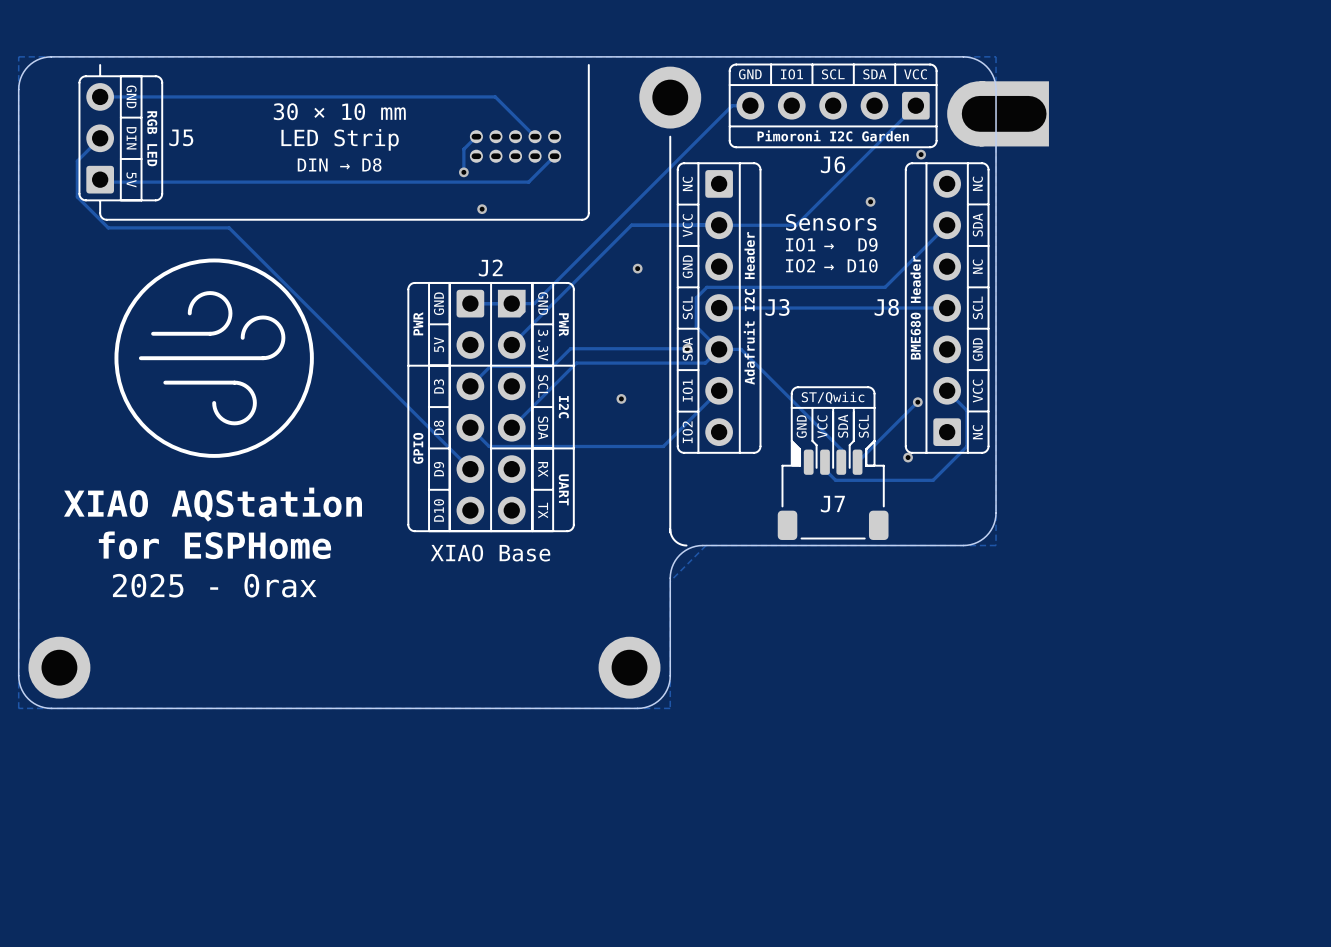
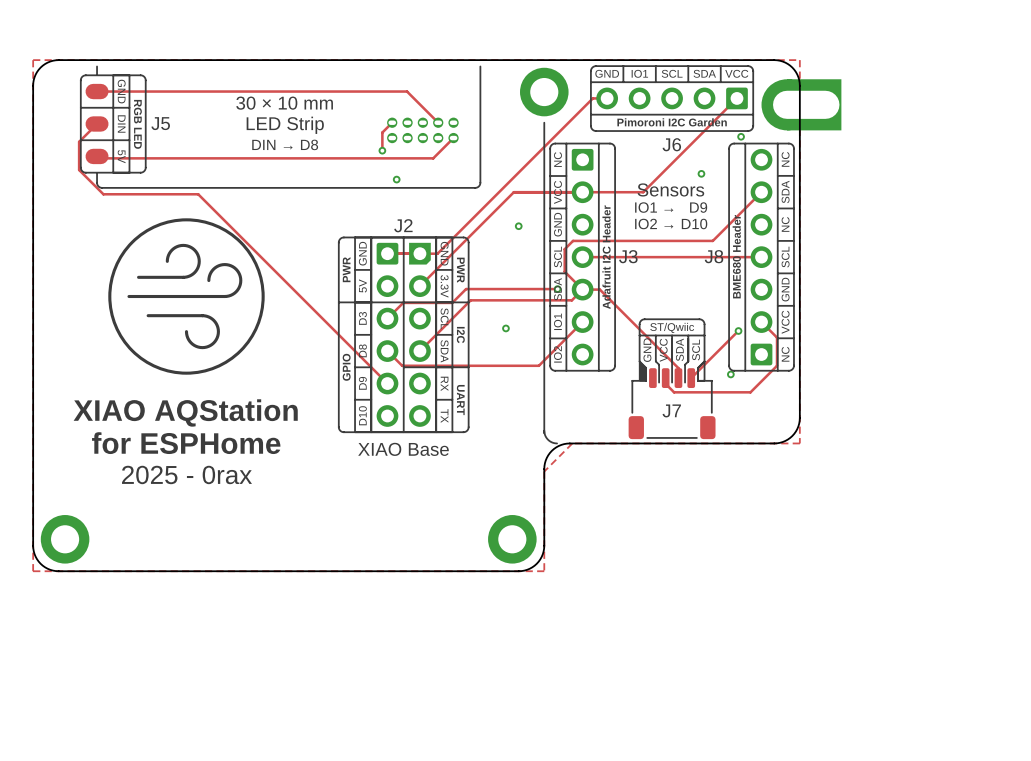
J5 footprint: [78, 75, 164, 202] -> [80, 74, 147, 174]

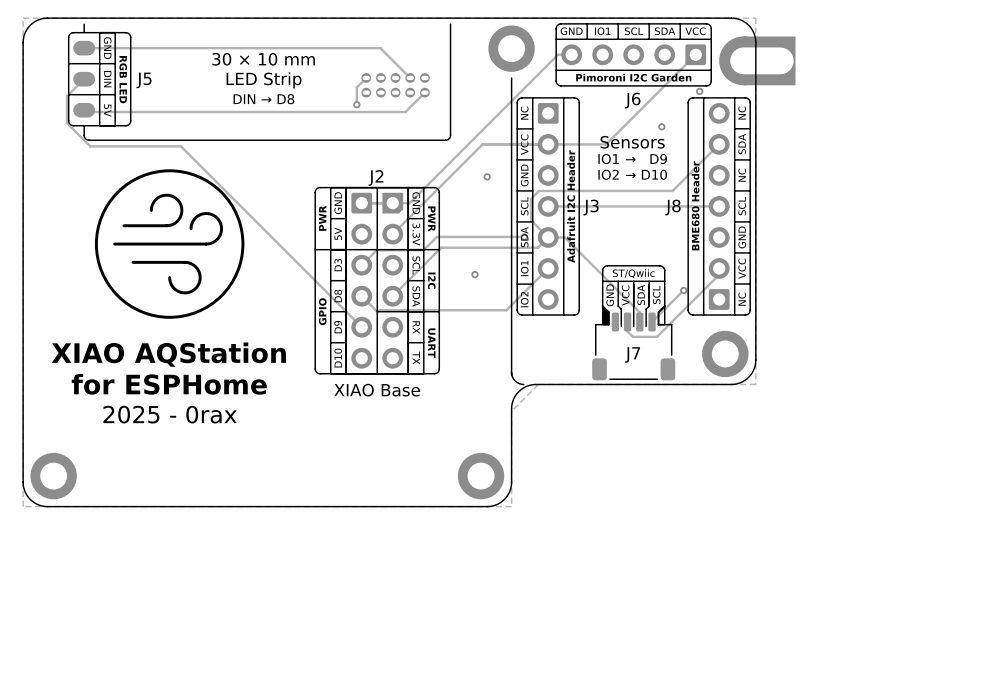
via: (396, 179) -> none
track: (761, 322) (777, 337) (777, 365) (750, 392) (674, 392) (665, 383) -> (719, 268) (719, 274) (657, 336) (632, 336) (627, 331) (627, 327)
track: (738, 331) (724, 345) -> none
via: (738, 331) -> none
via: none -> (683, 290)
via: (730, 374) -> none
part: none -> (725, 353)

